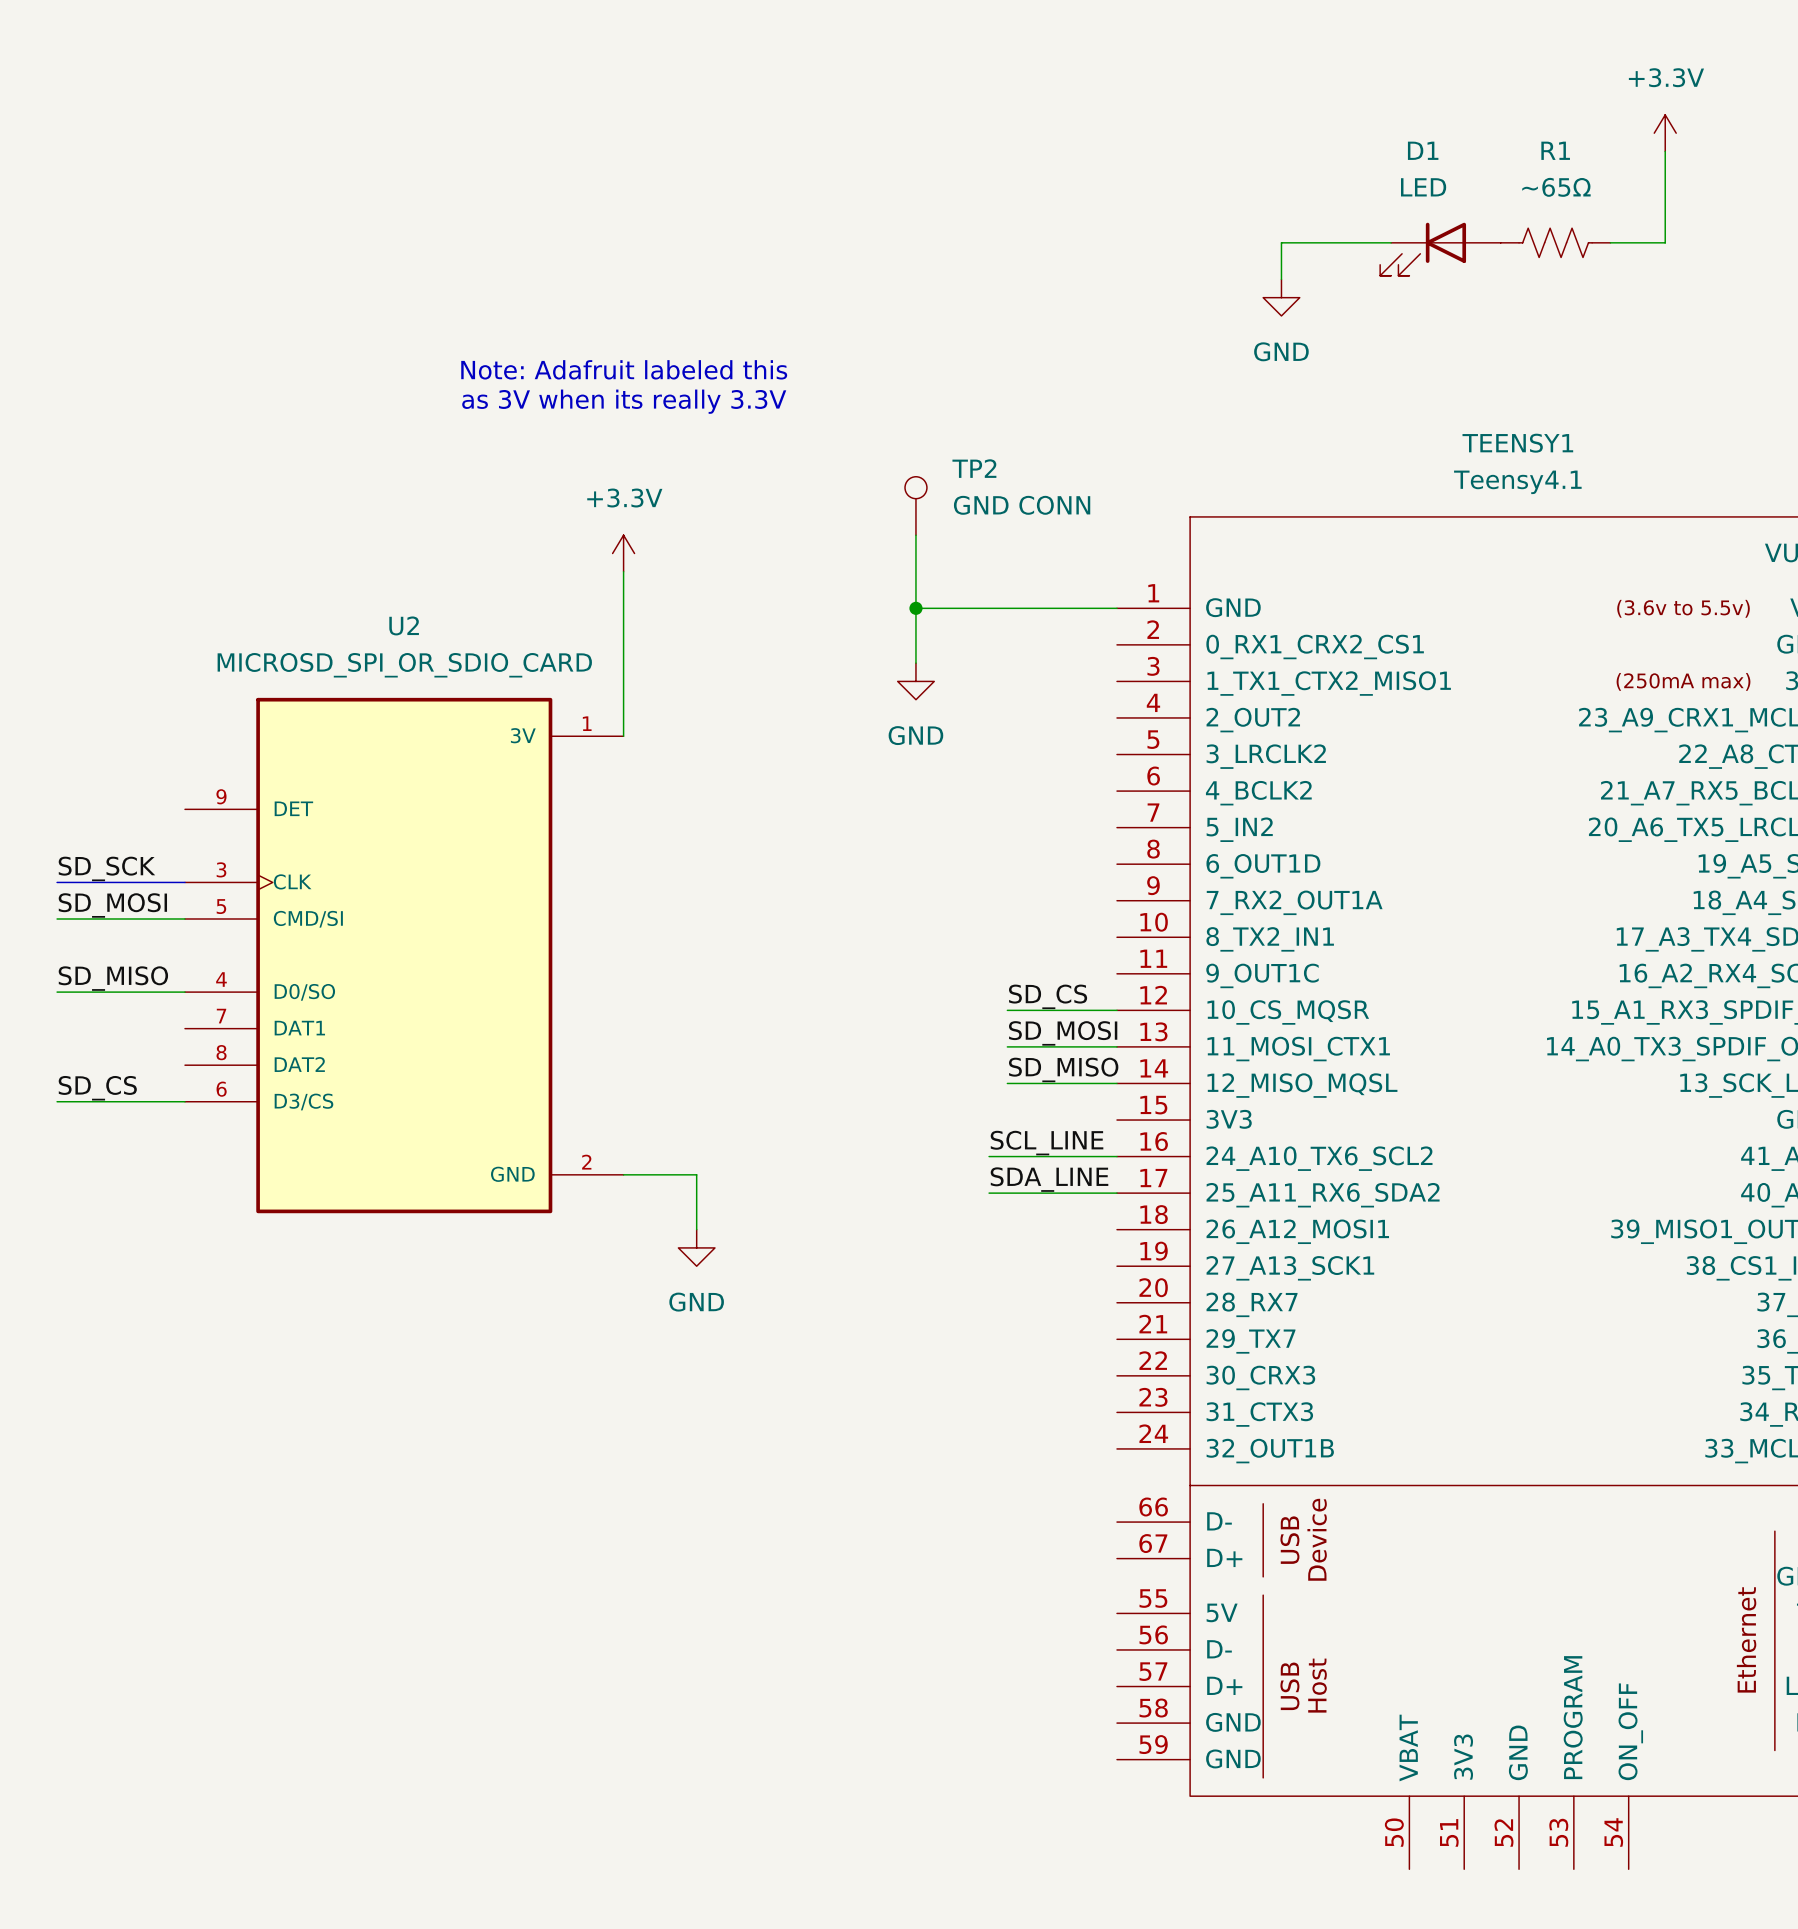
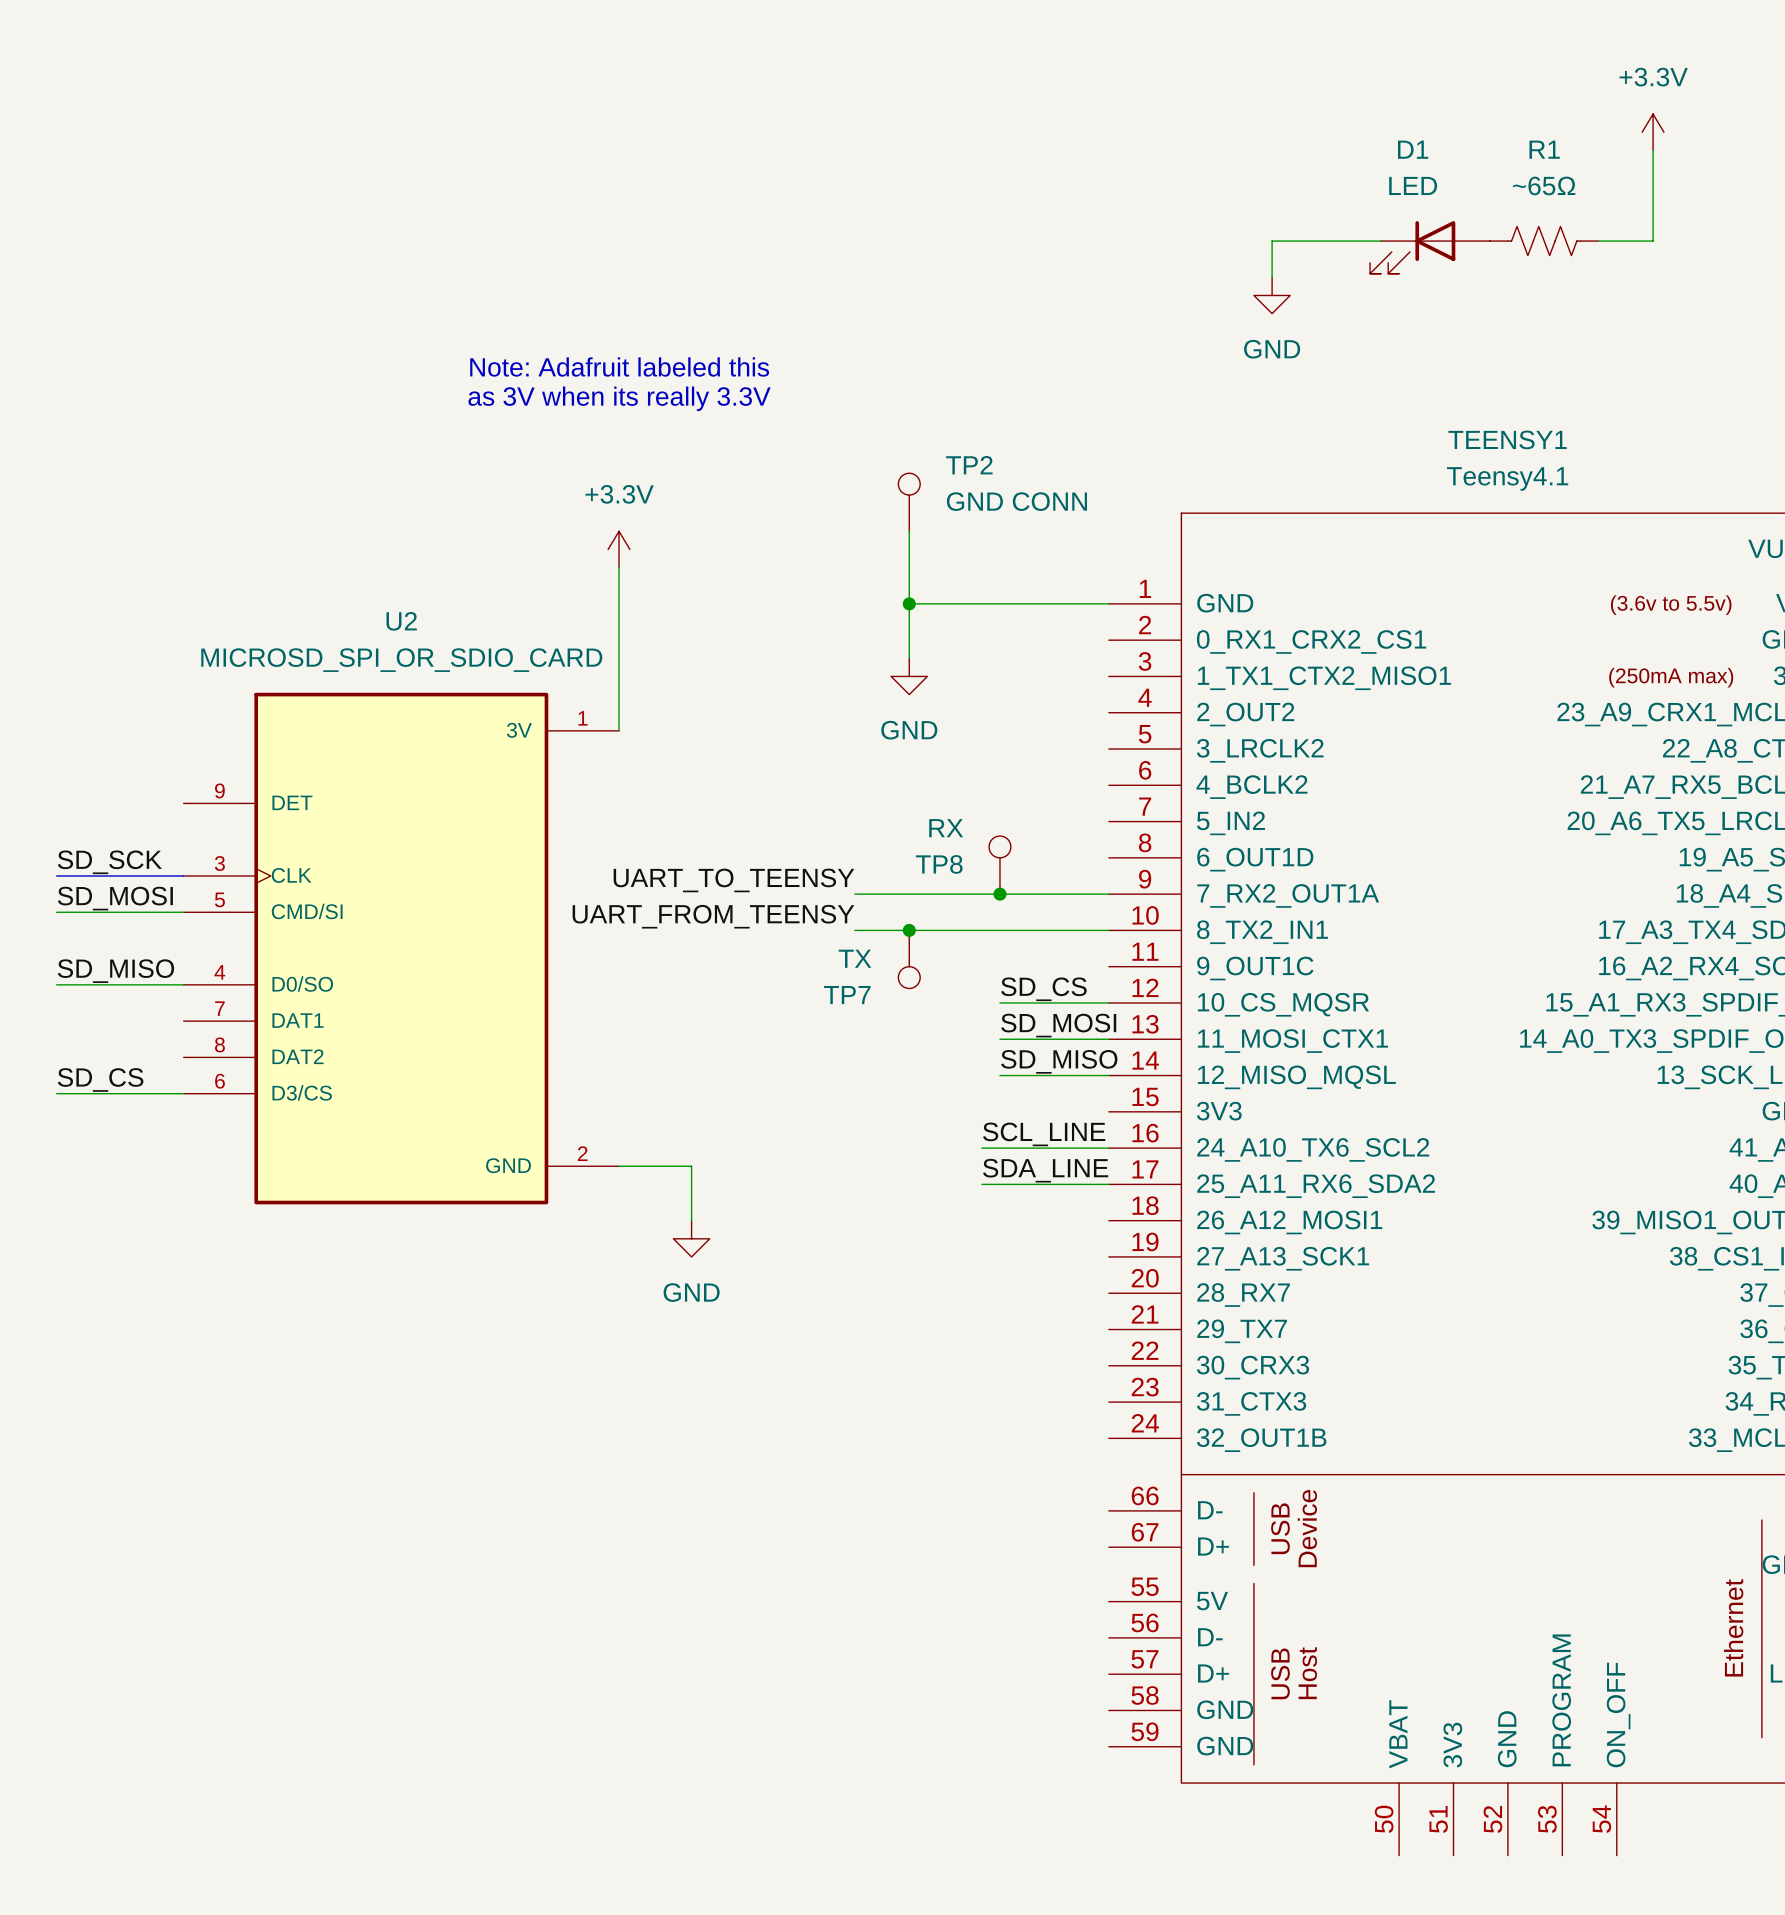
TP8: none -> RX (999, 865)
label: none -> UART_TO_TEENSY (733, 880)
wire: none -> (854, 894) (1108, 894)
junction: none -> (999, 894)
label: none -> UART_FROM_TEENSY (713, 916)
wire: none -> (854, 930) (1108, 930)
junction: none -> (909, 930)
TP7: none -> TX (909, 959)

